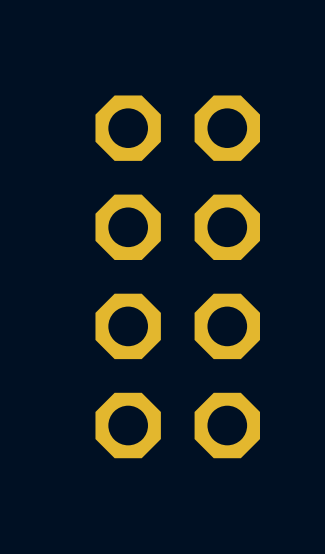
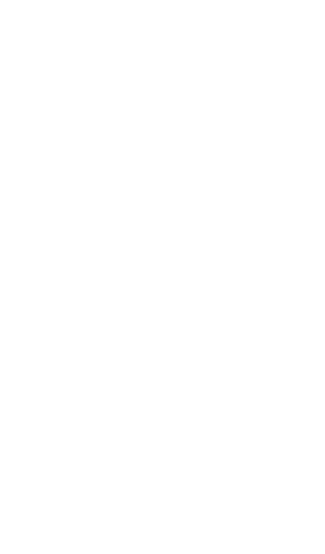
part: (177, 276) -> none

